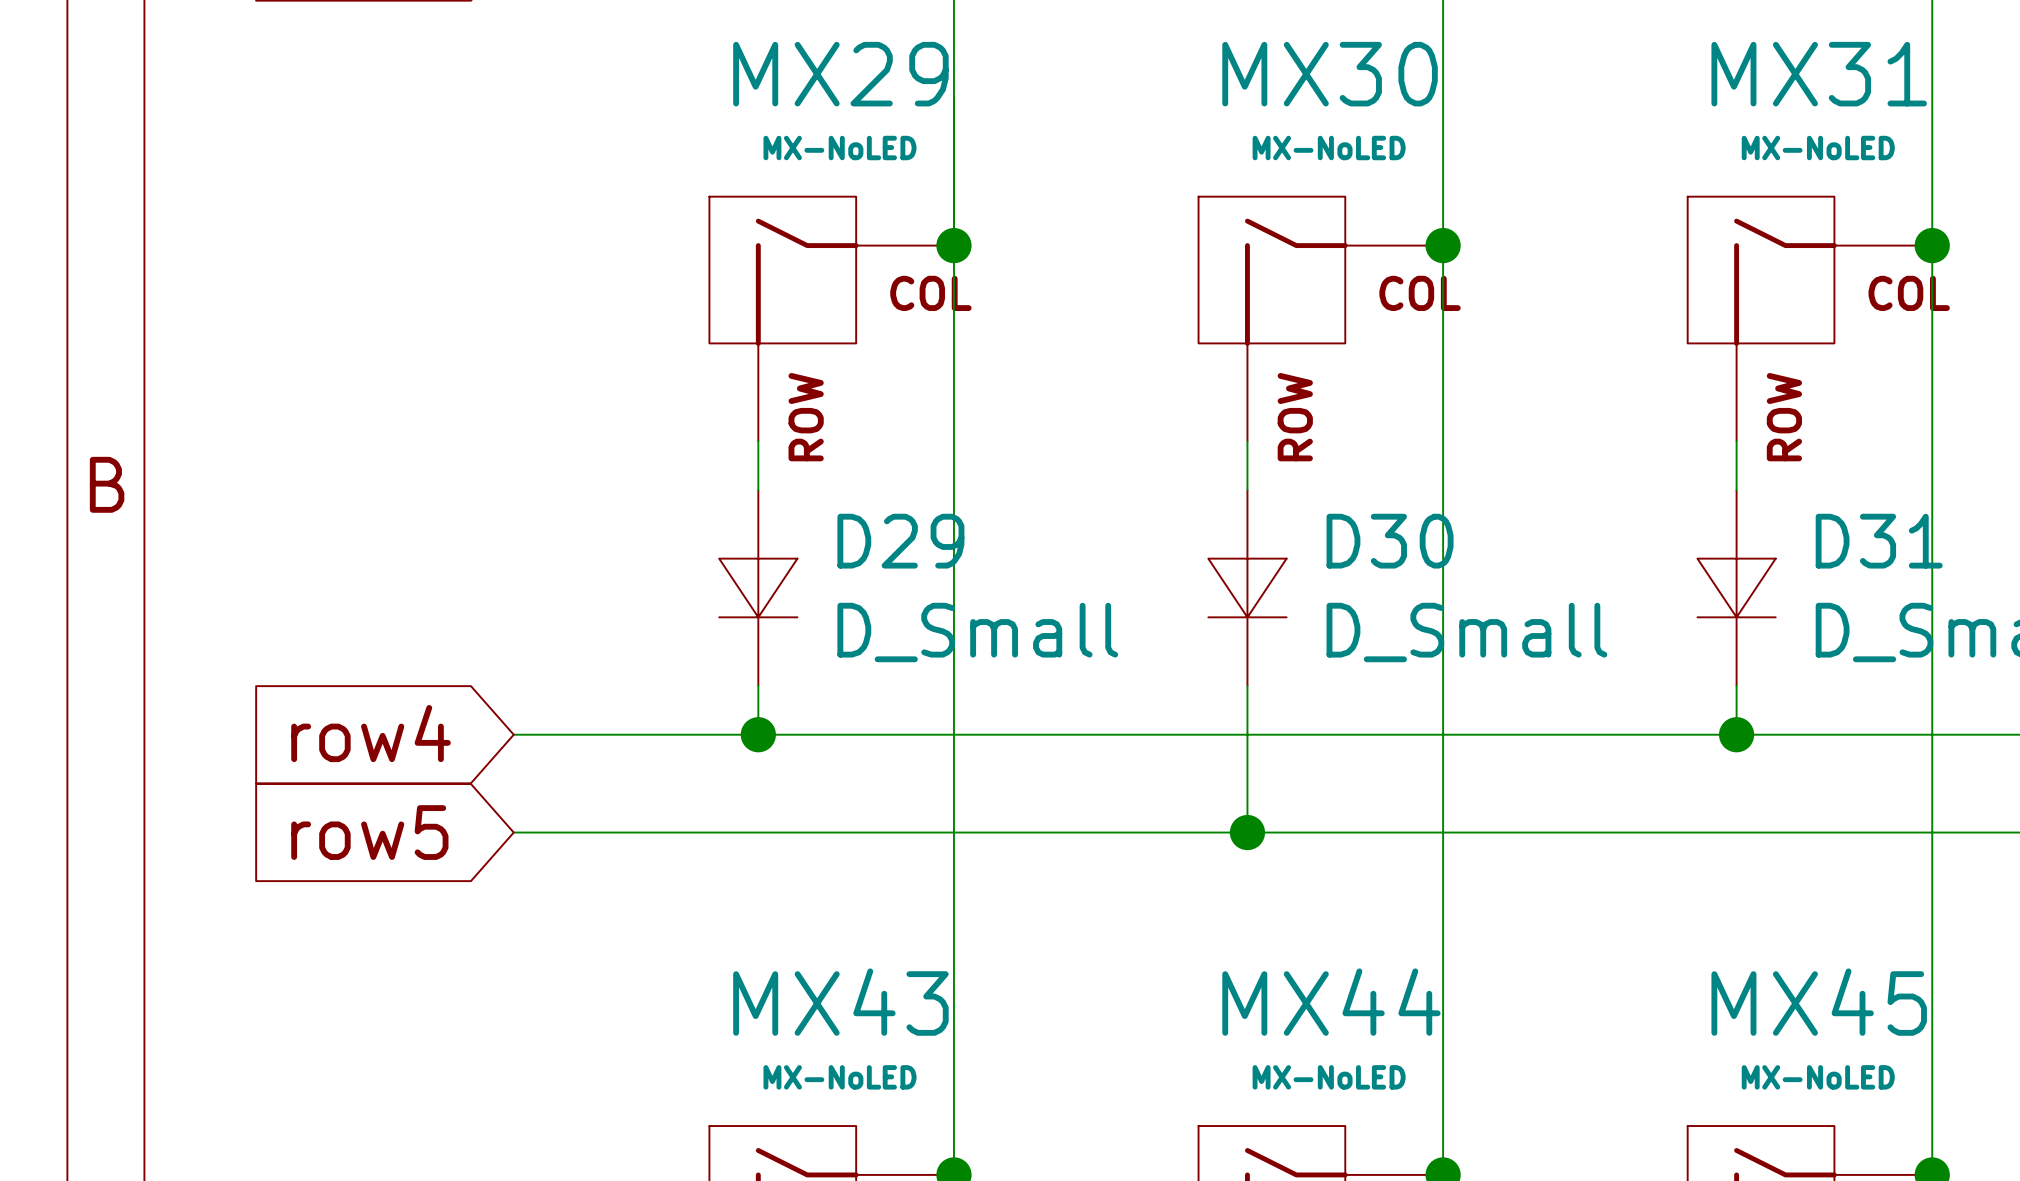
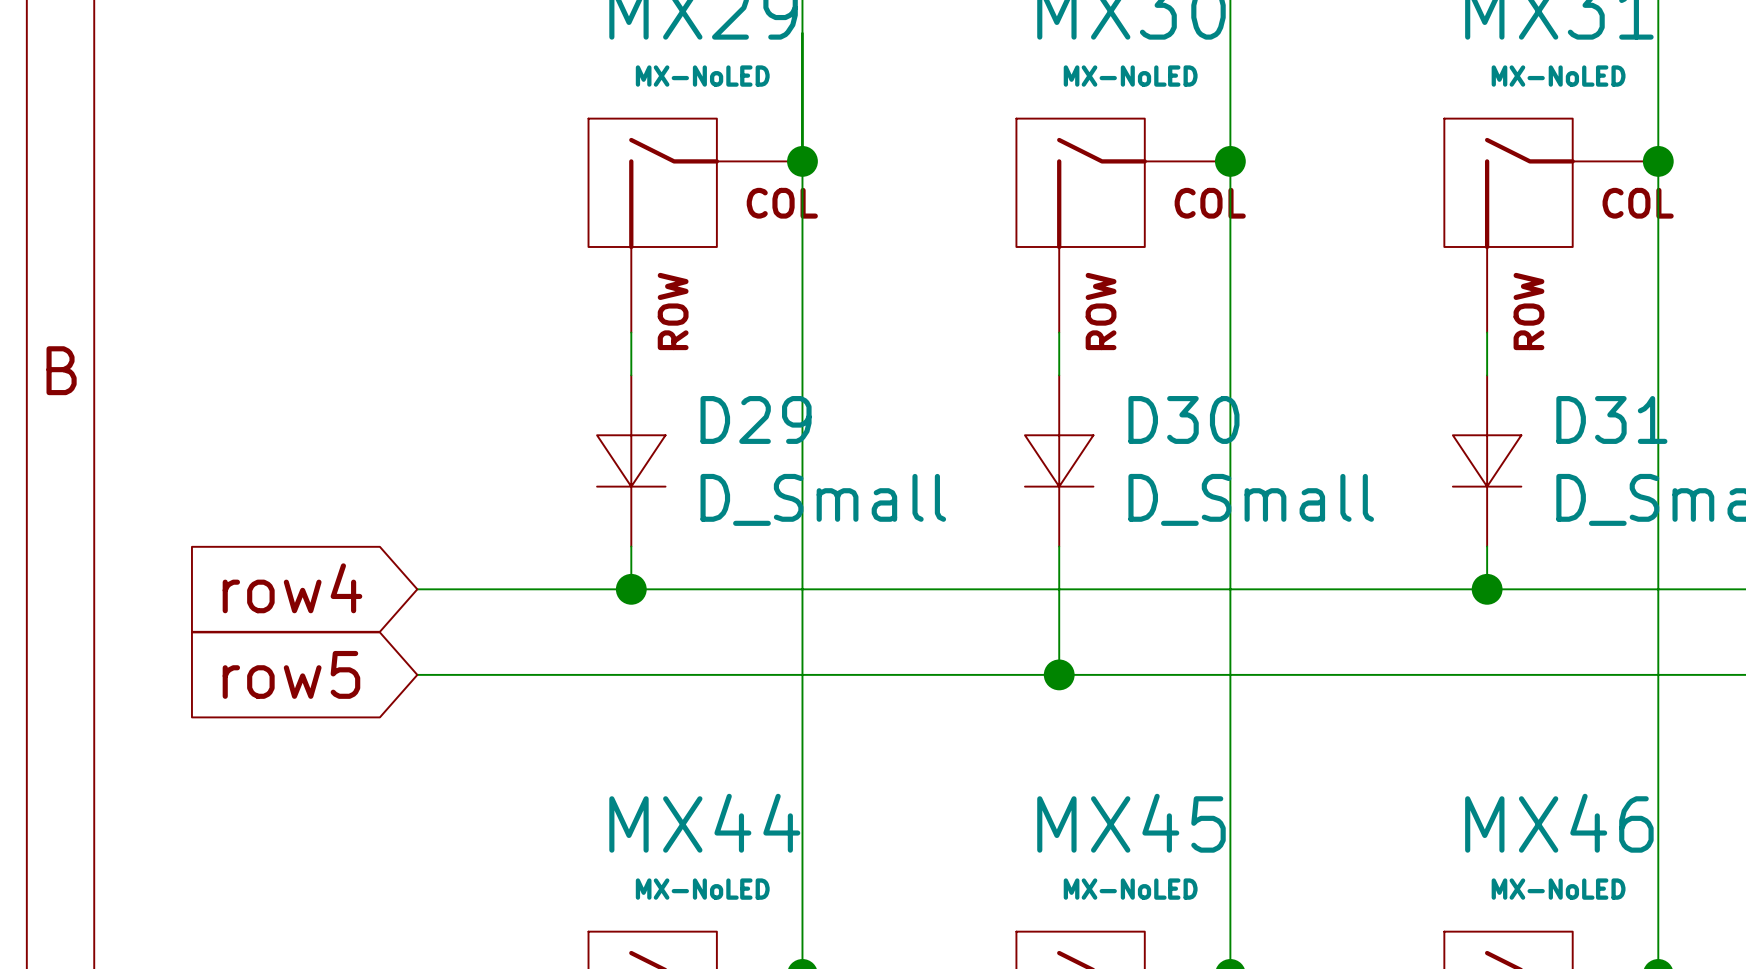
MX43 name: MX43 (840, 1002) -> MX44 (704, 823)
MX44 name: MX44 (1331, 1002) -> MX45 (1131, 823)
MX45 name: MX45 (1819, 1002) -> MX46 (1559, 823)

